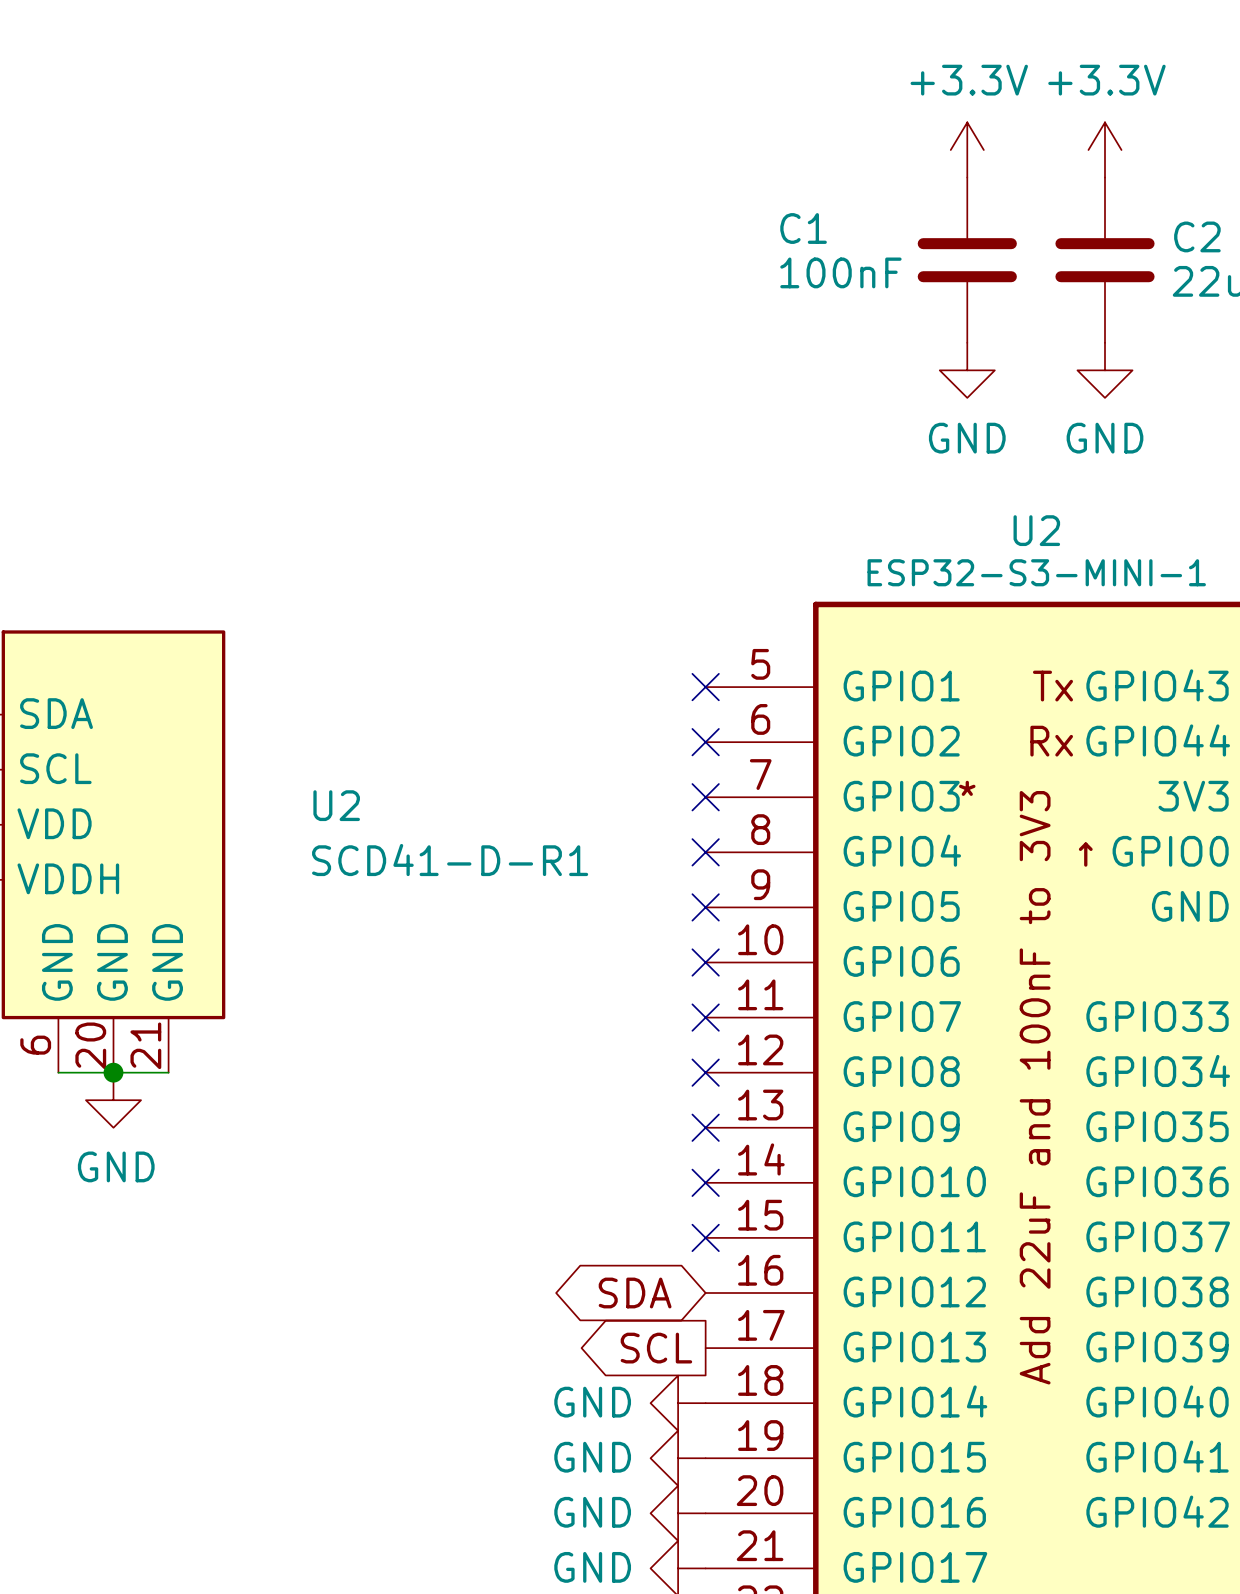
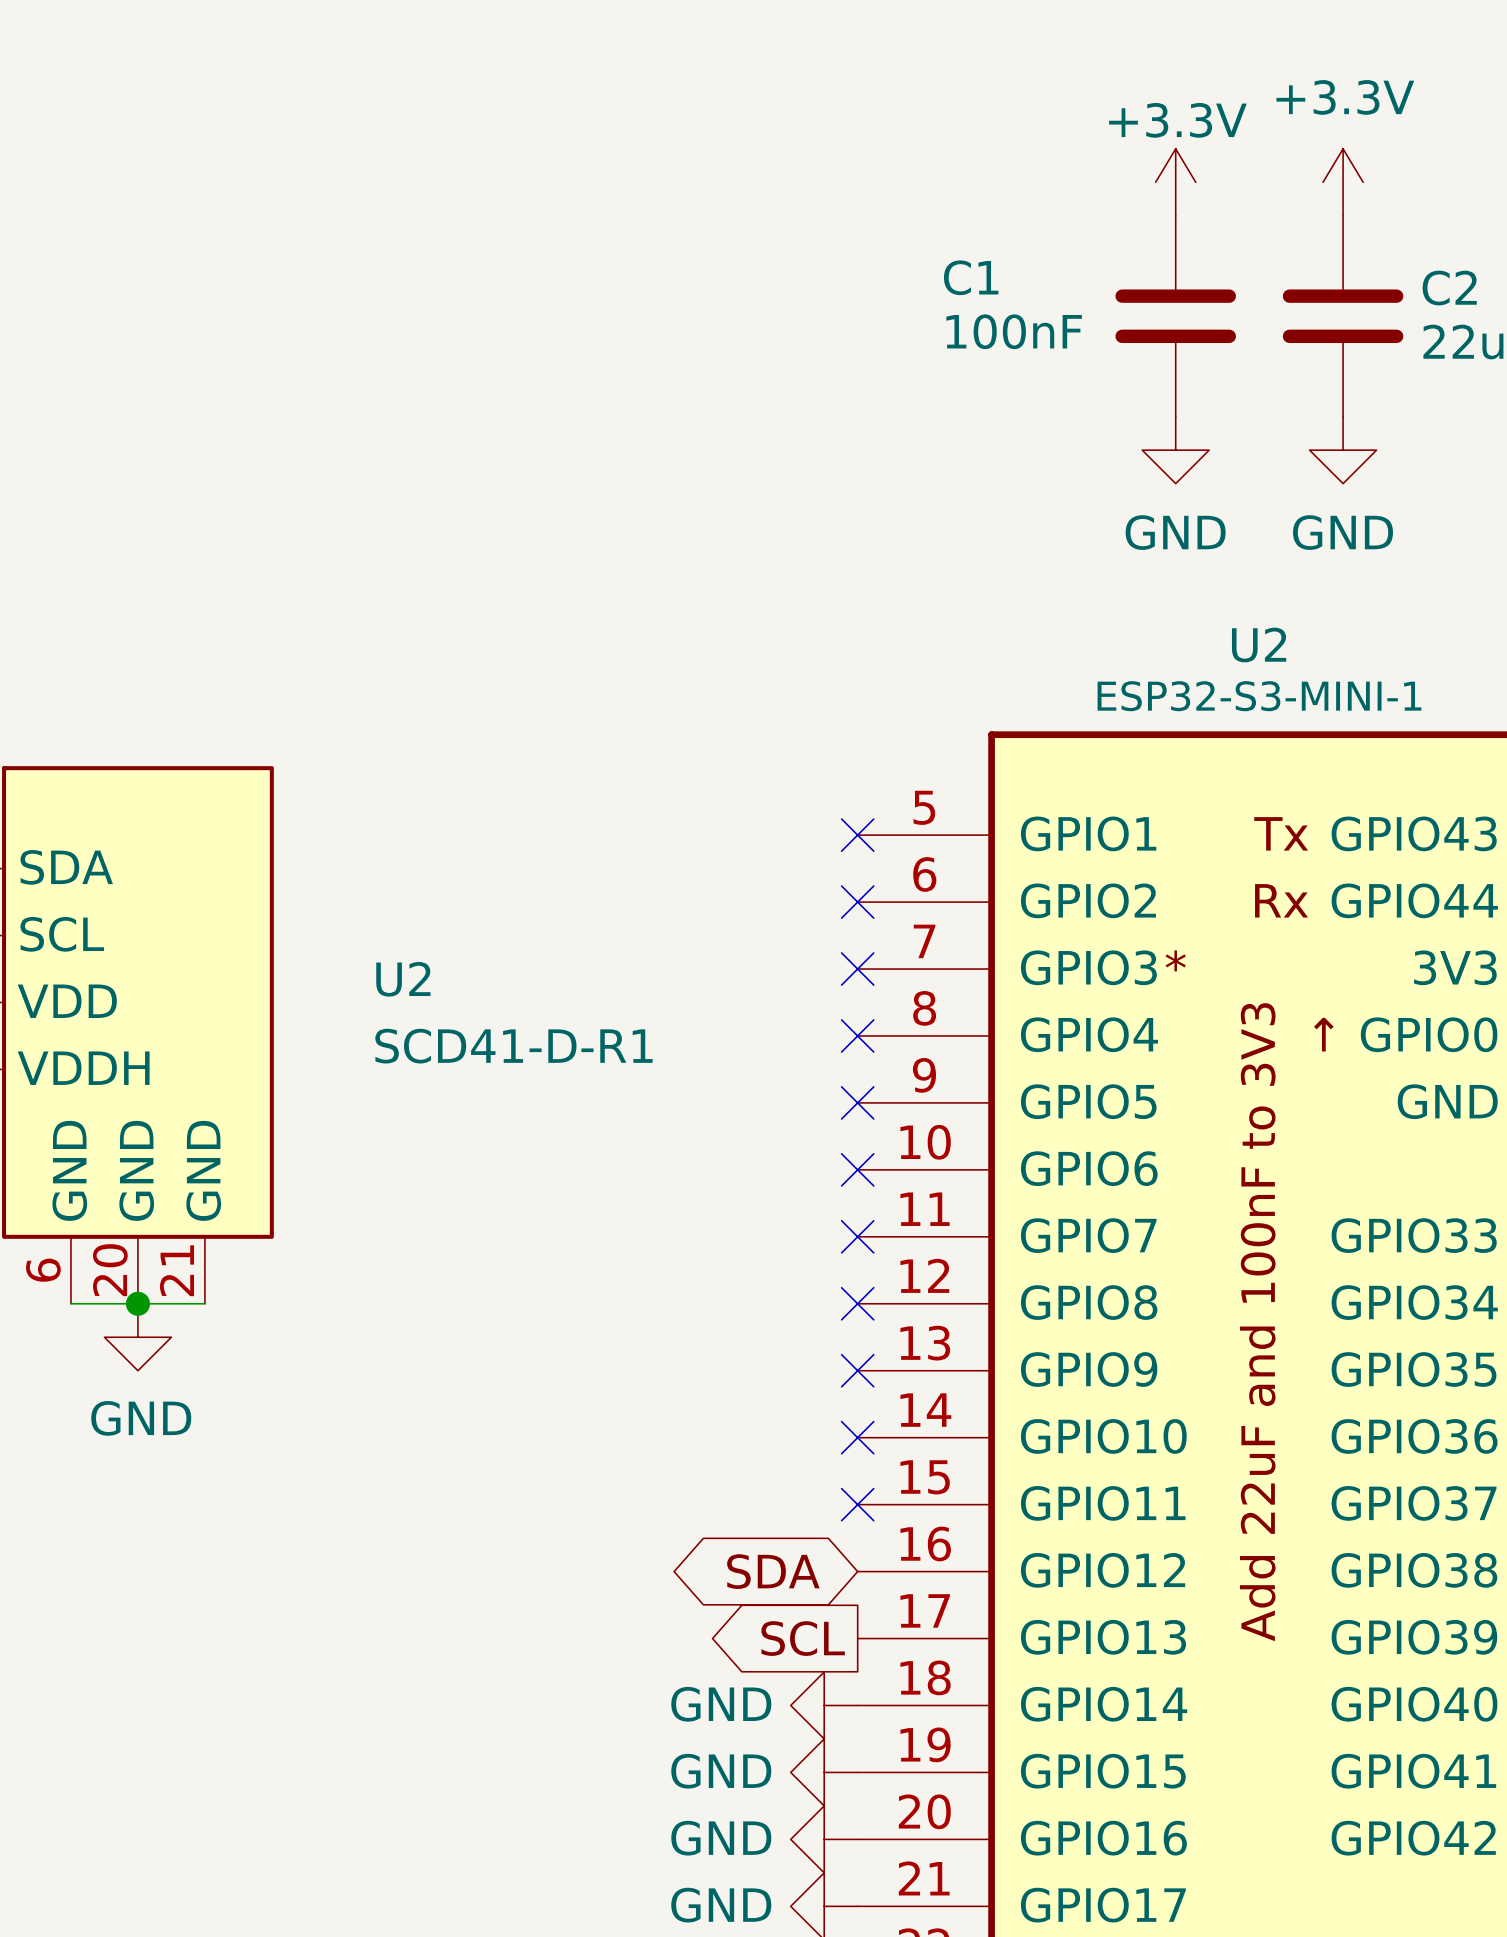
power symbol text position: +3.3V (969, 80) -> +3.3V (1177, 120)

